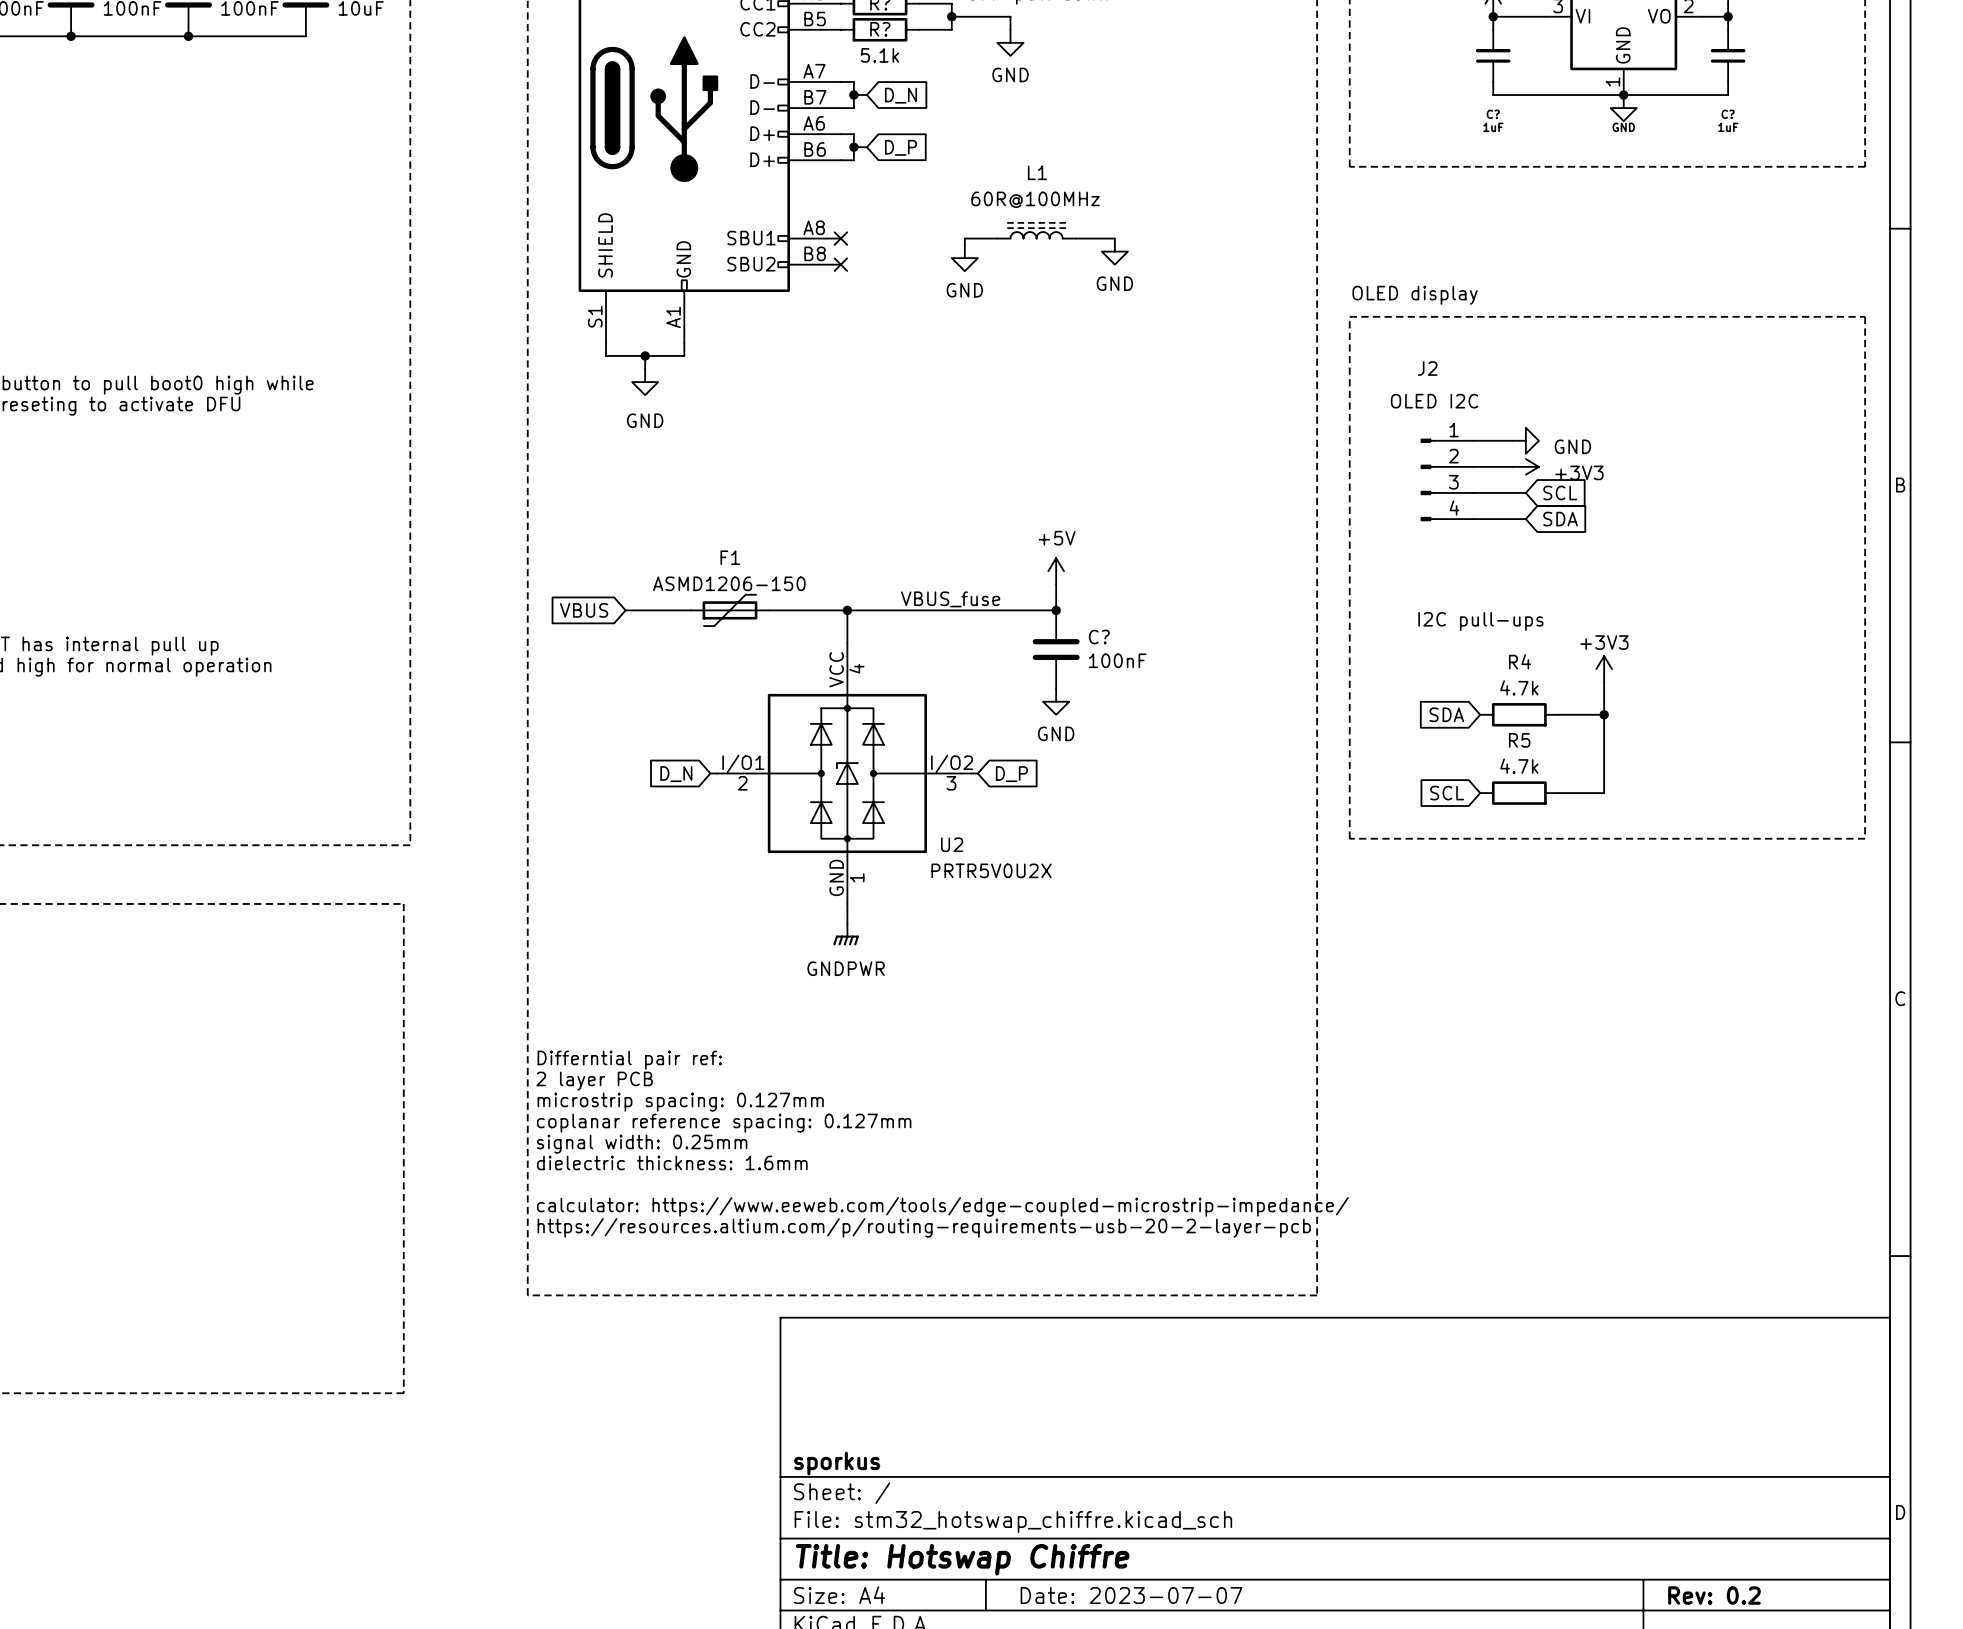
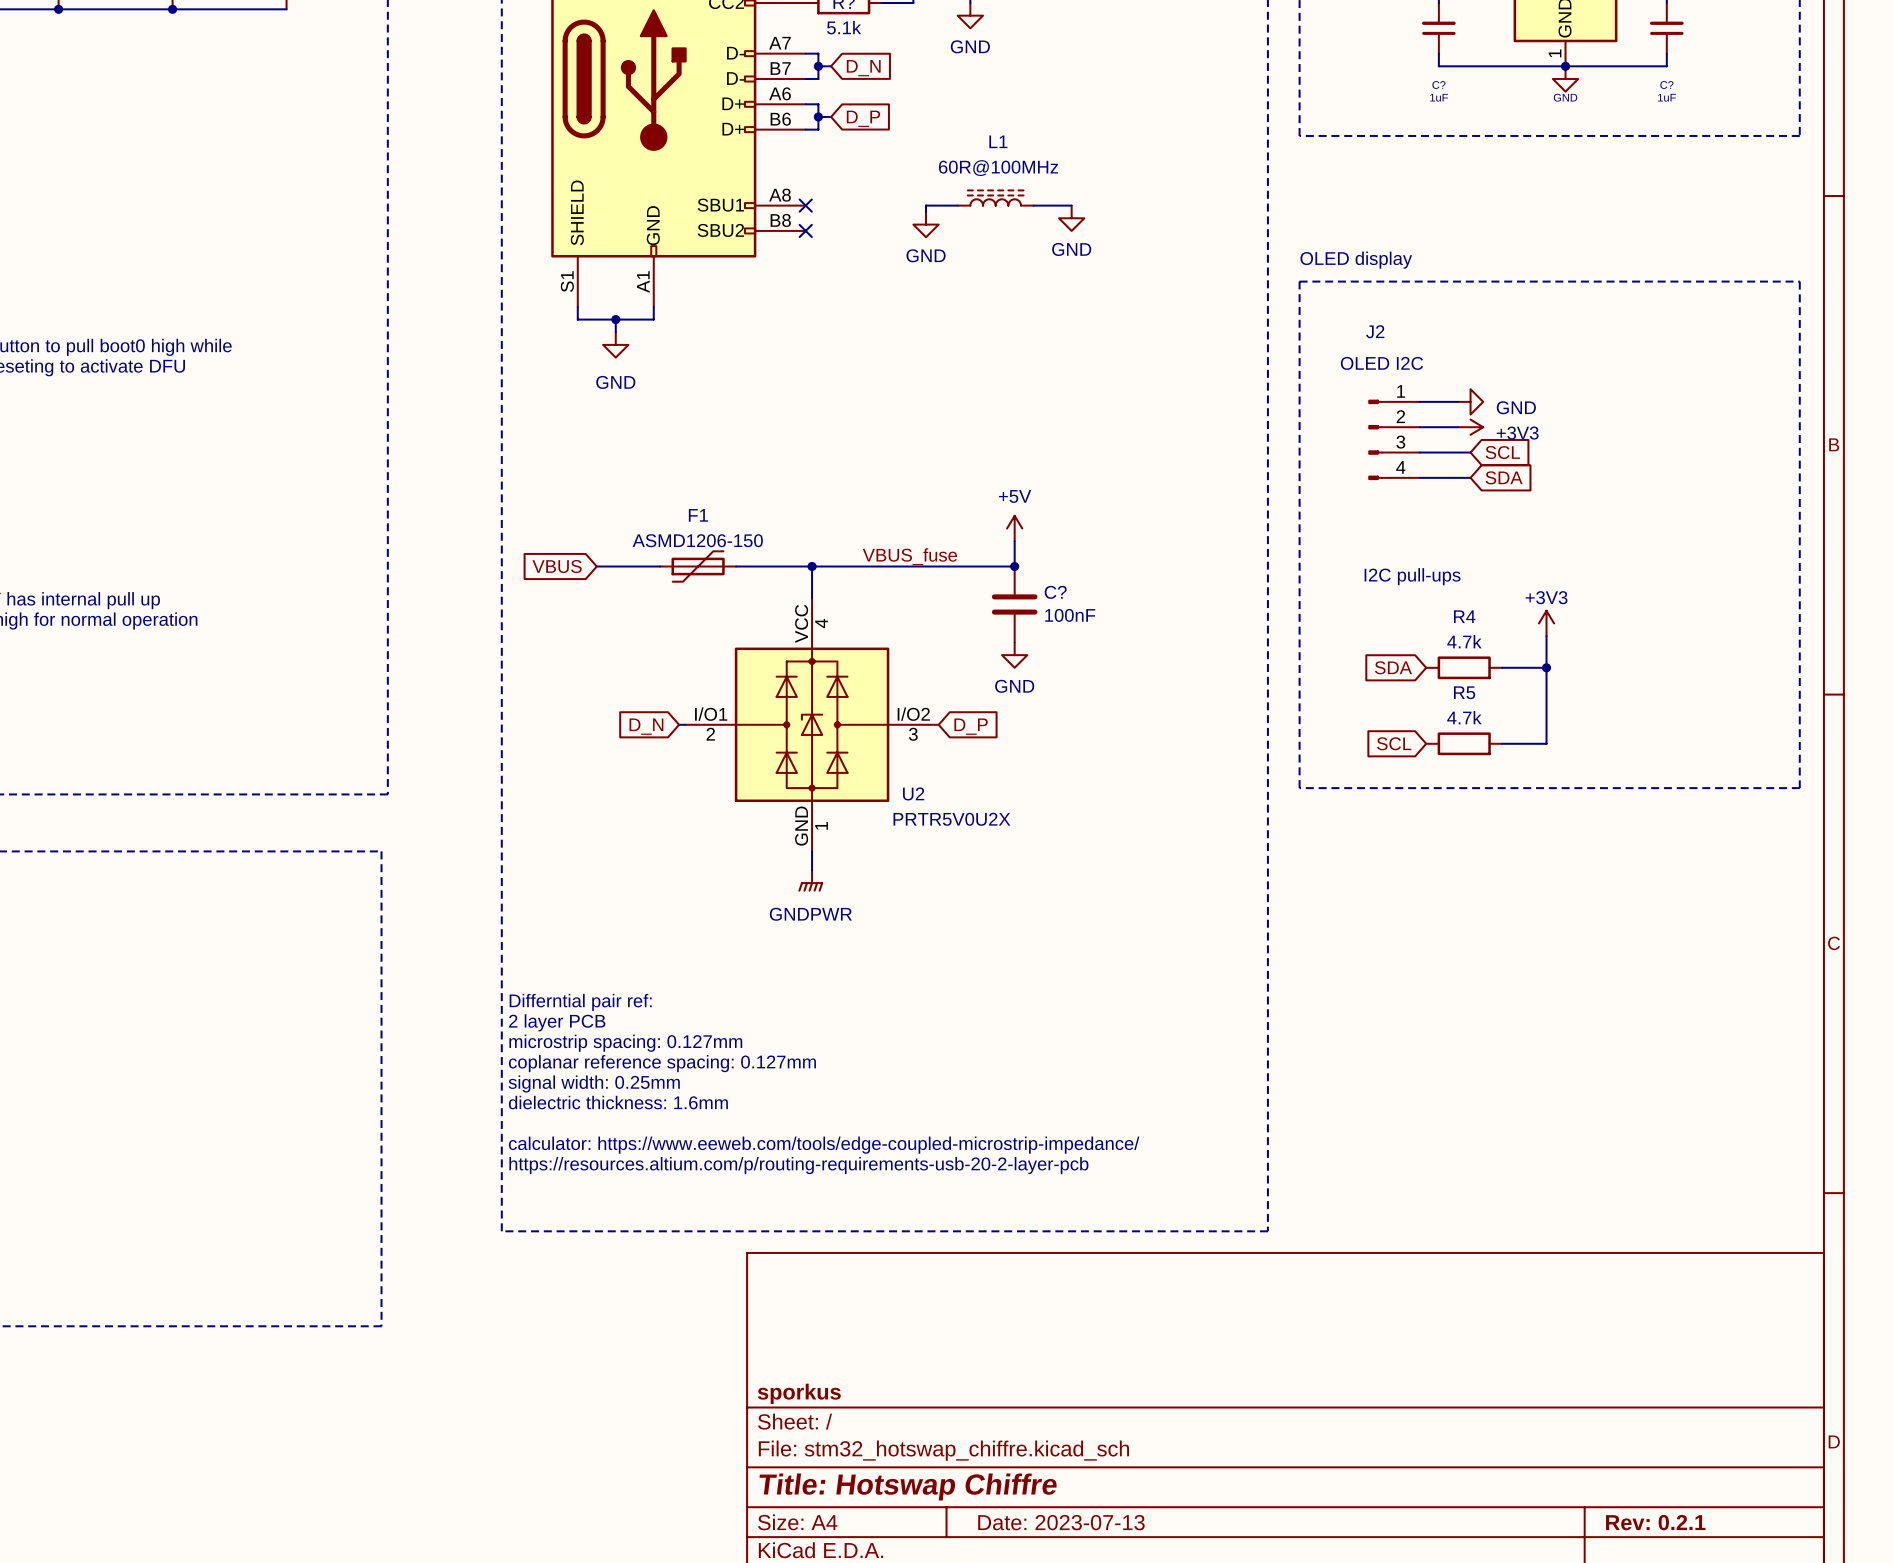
title block: Date: 2023-07-07 (1131, 1595) -> Date: 2023-07-13 (1061, 1522)
title block: Rev: 0.2 (1714, 1595) -> Rev: 0.2.1 (1655, 1522)

